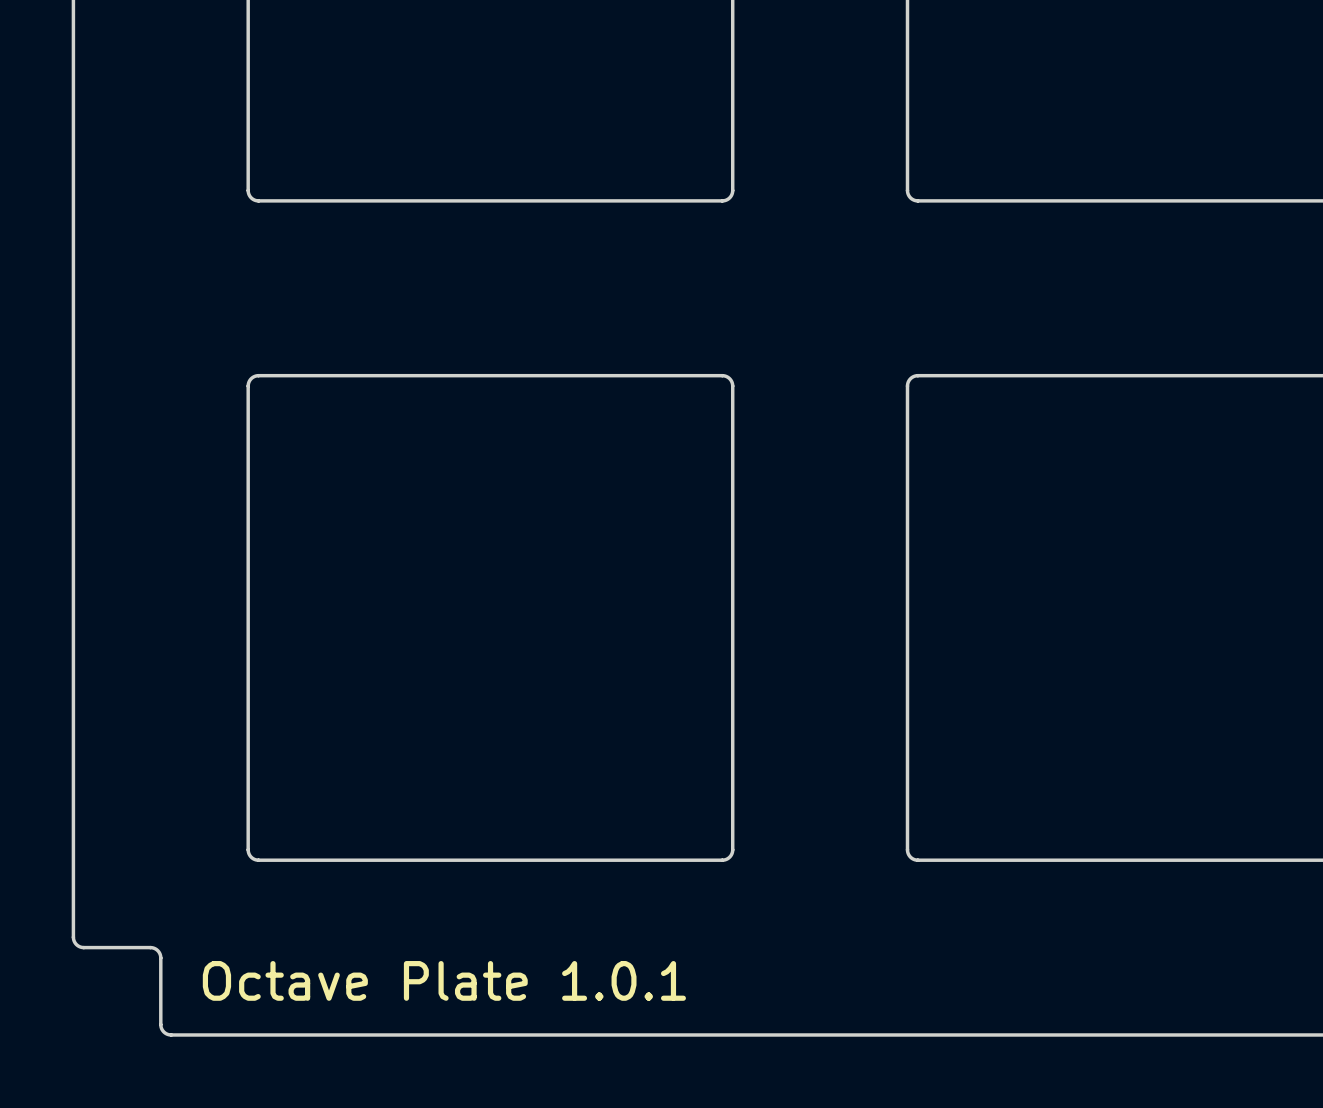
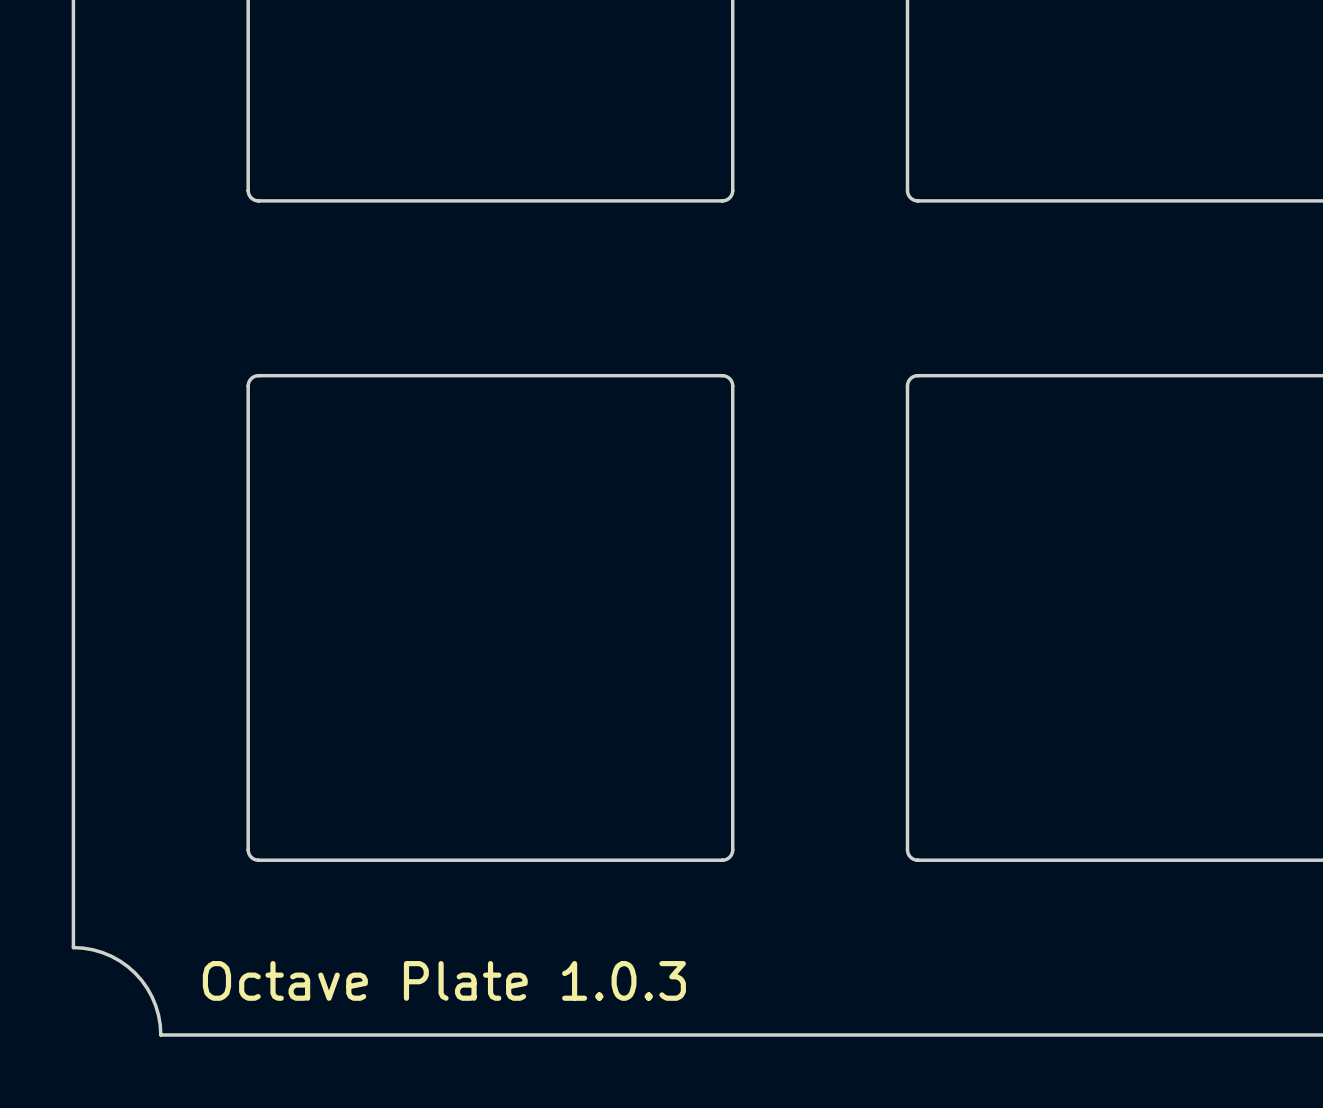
board edge: (73, 937) (75, 943) (82, 947) (150, 947) (157, 950) (160, 957) (160, 1025) (163, 1031) (171, 1034) -> (73, 937) (73, 947) (92, 949) (111, 956) (135, 973) (152, 997) (158, 1015) (160, 1034) (171, 1034)
text: Octave Plate 1.0.1 (444, 980) -> Octave Plate 1.0.3 (444, 980)

